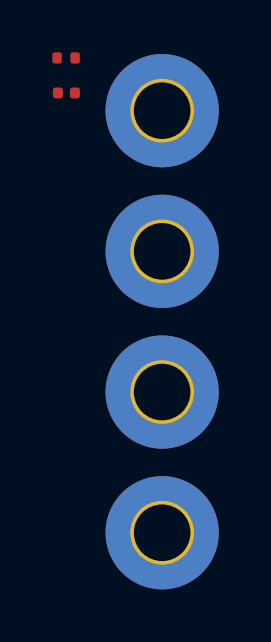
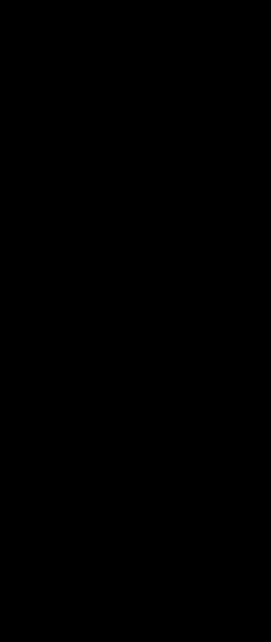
part: (66, 57) -> none
part: (66, 92) -> none
part: (162, 110) -> none
part: (162, 251) -> none
part: (162, 392) -> none
part: (162, 532) -> none

